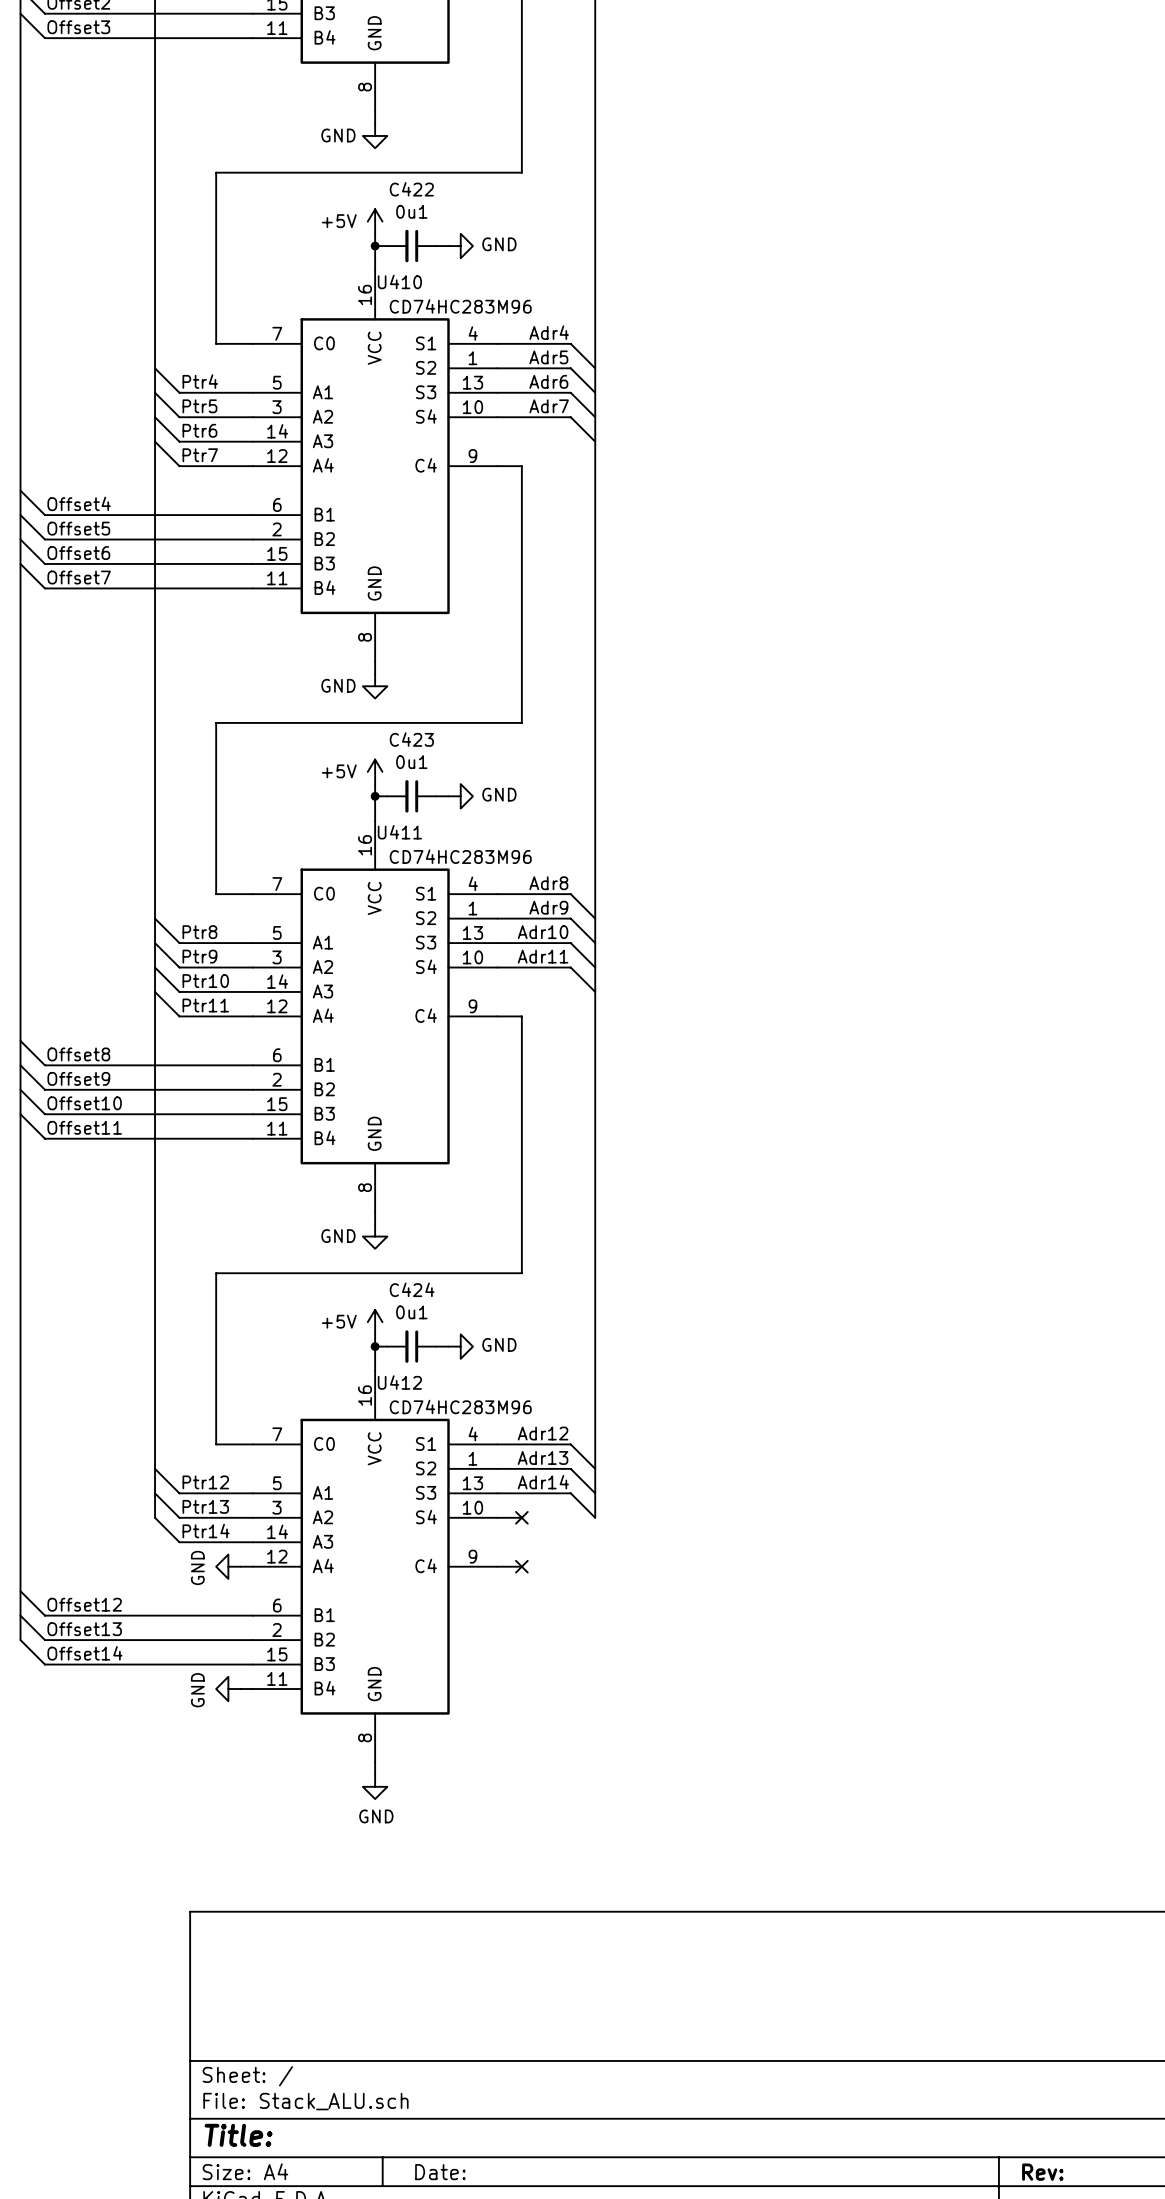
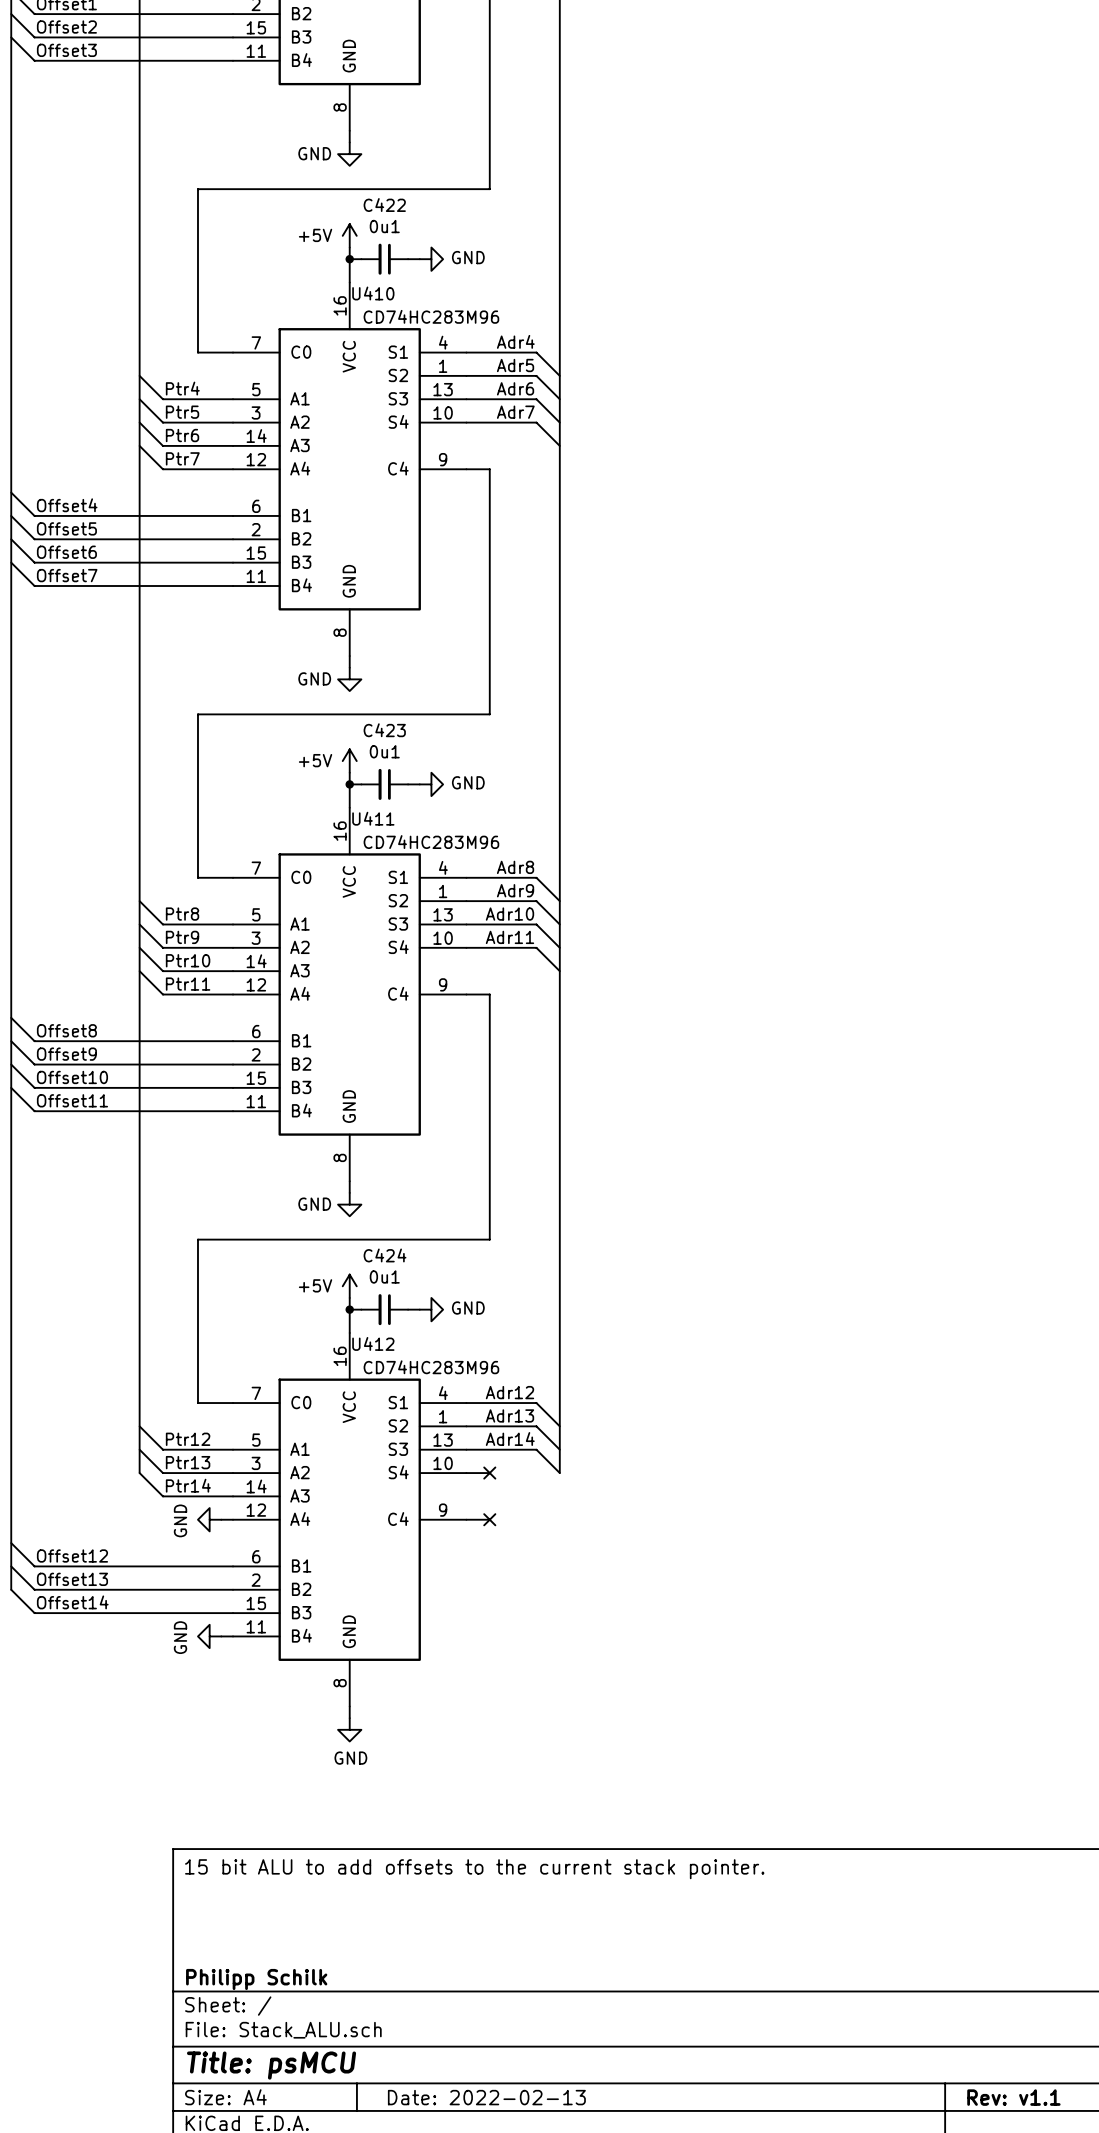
title block: none -> 15 bit ALU to add offsets to the current stack pointer. (474, 1869)
title block: none -> Philipp Schilk (256, 1979)
title block: Title: (238, 2135) -> Title: psMCU (271, 2065)
title block: Date: (440, 2172) -> Date: 2022-02-13 (486, 2097)
title block: Rev: (1042, 2172) -> Rev: v1.1 (1013, 2097)

